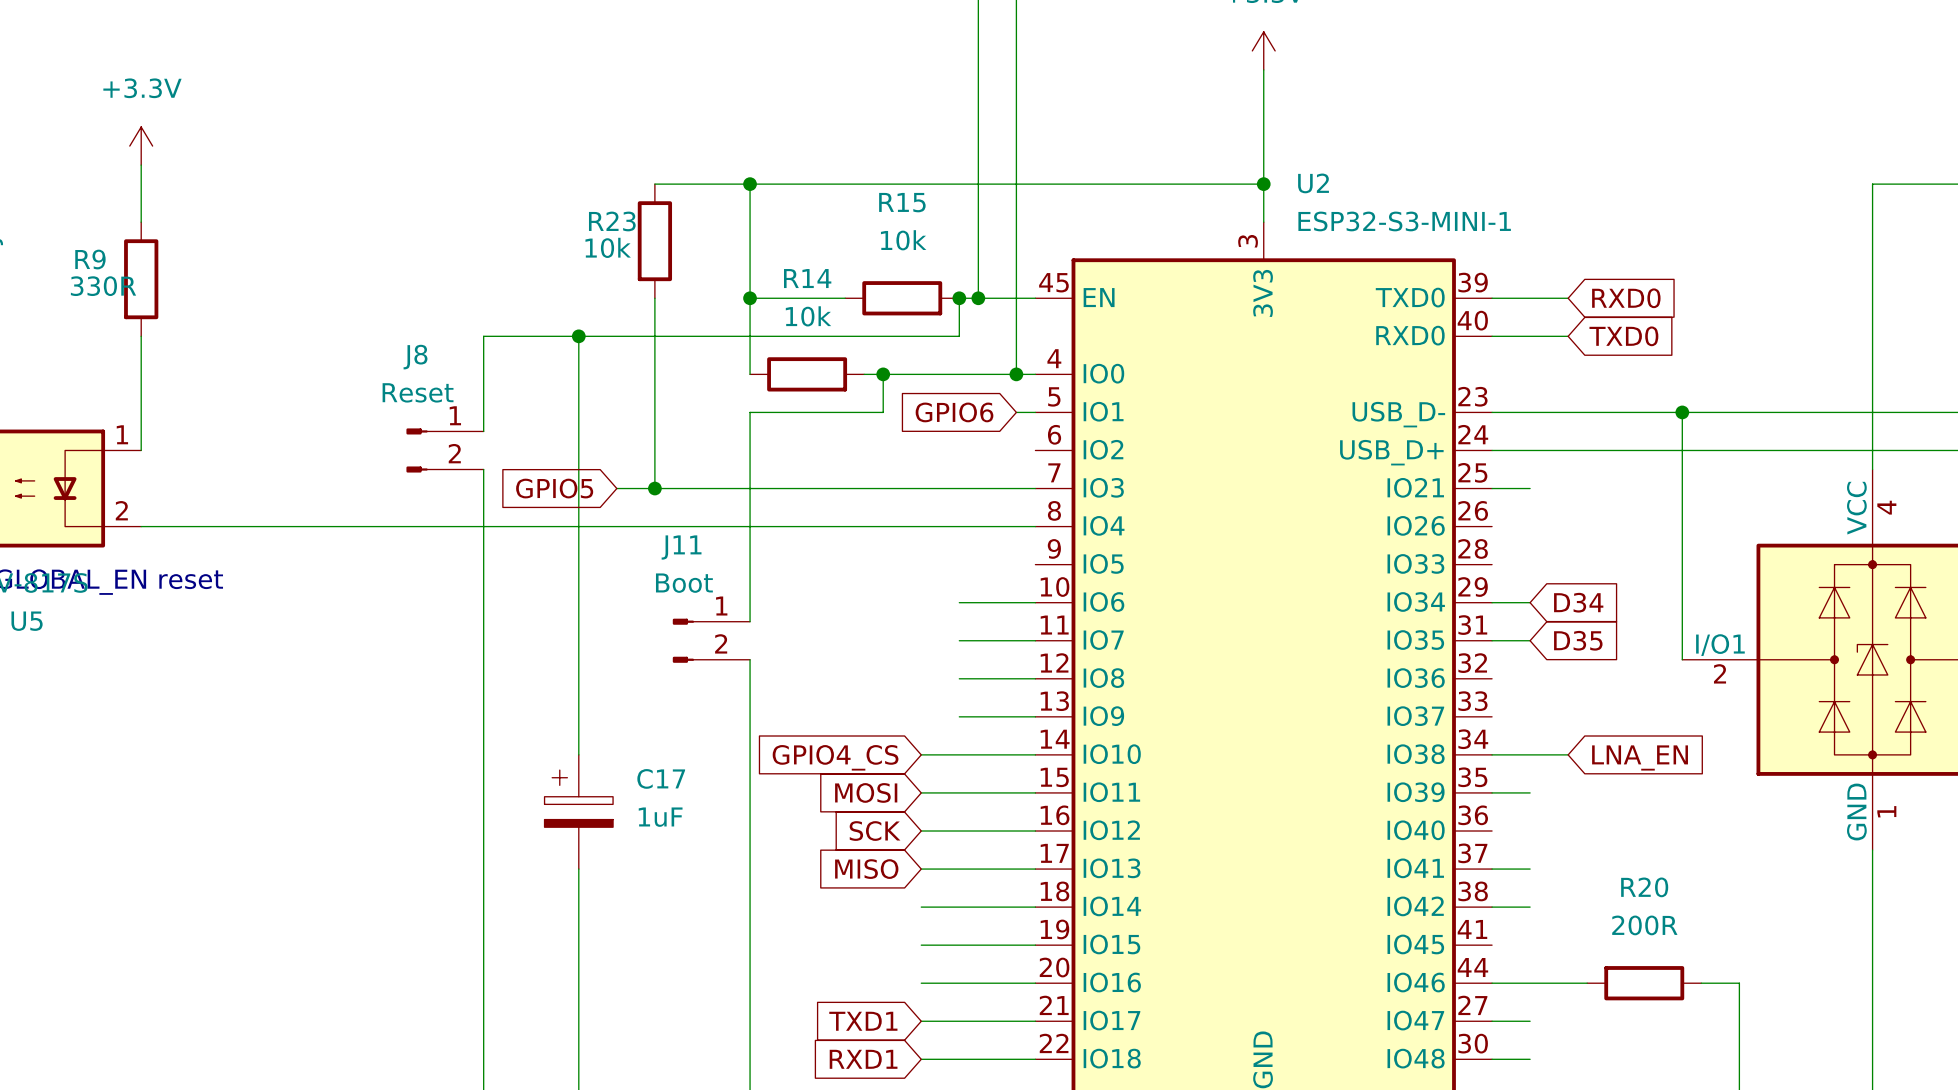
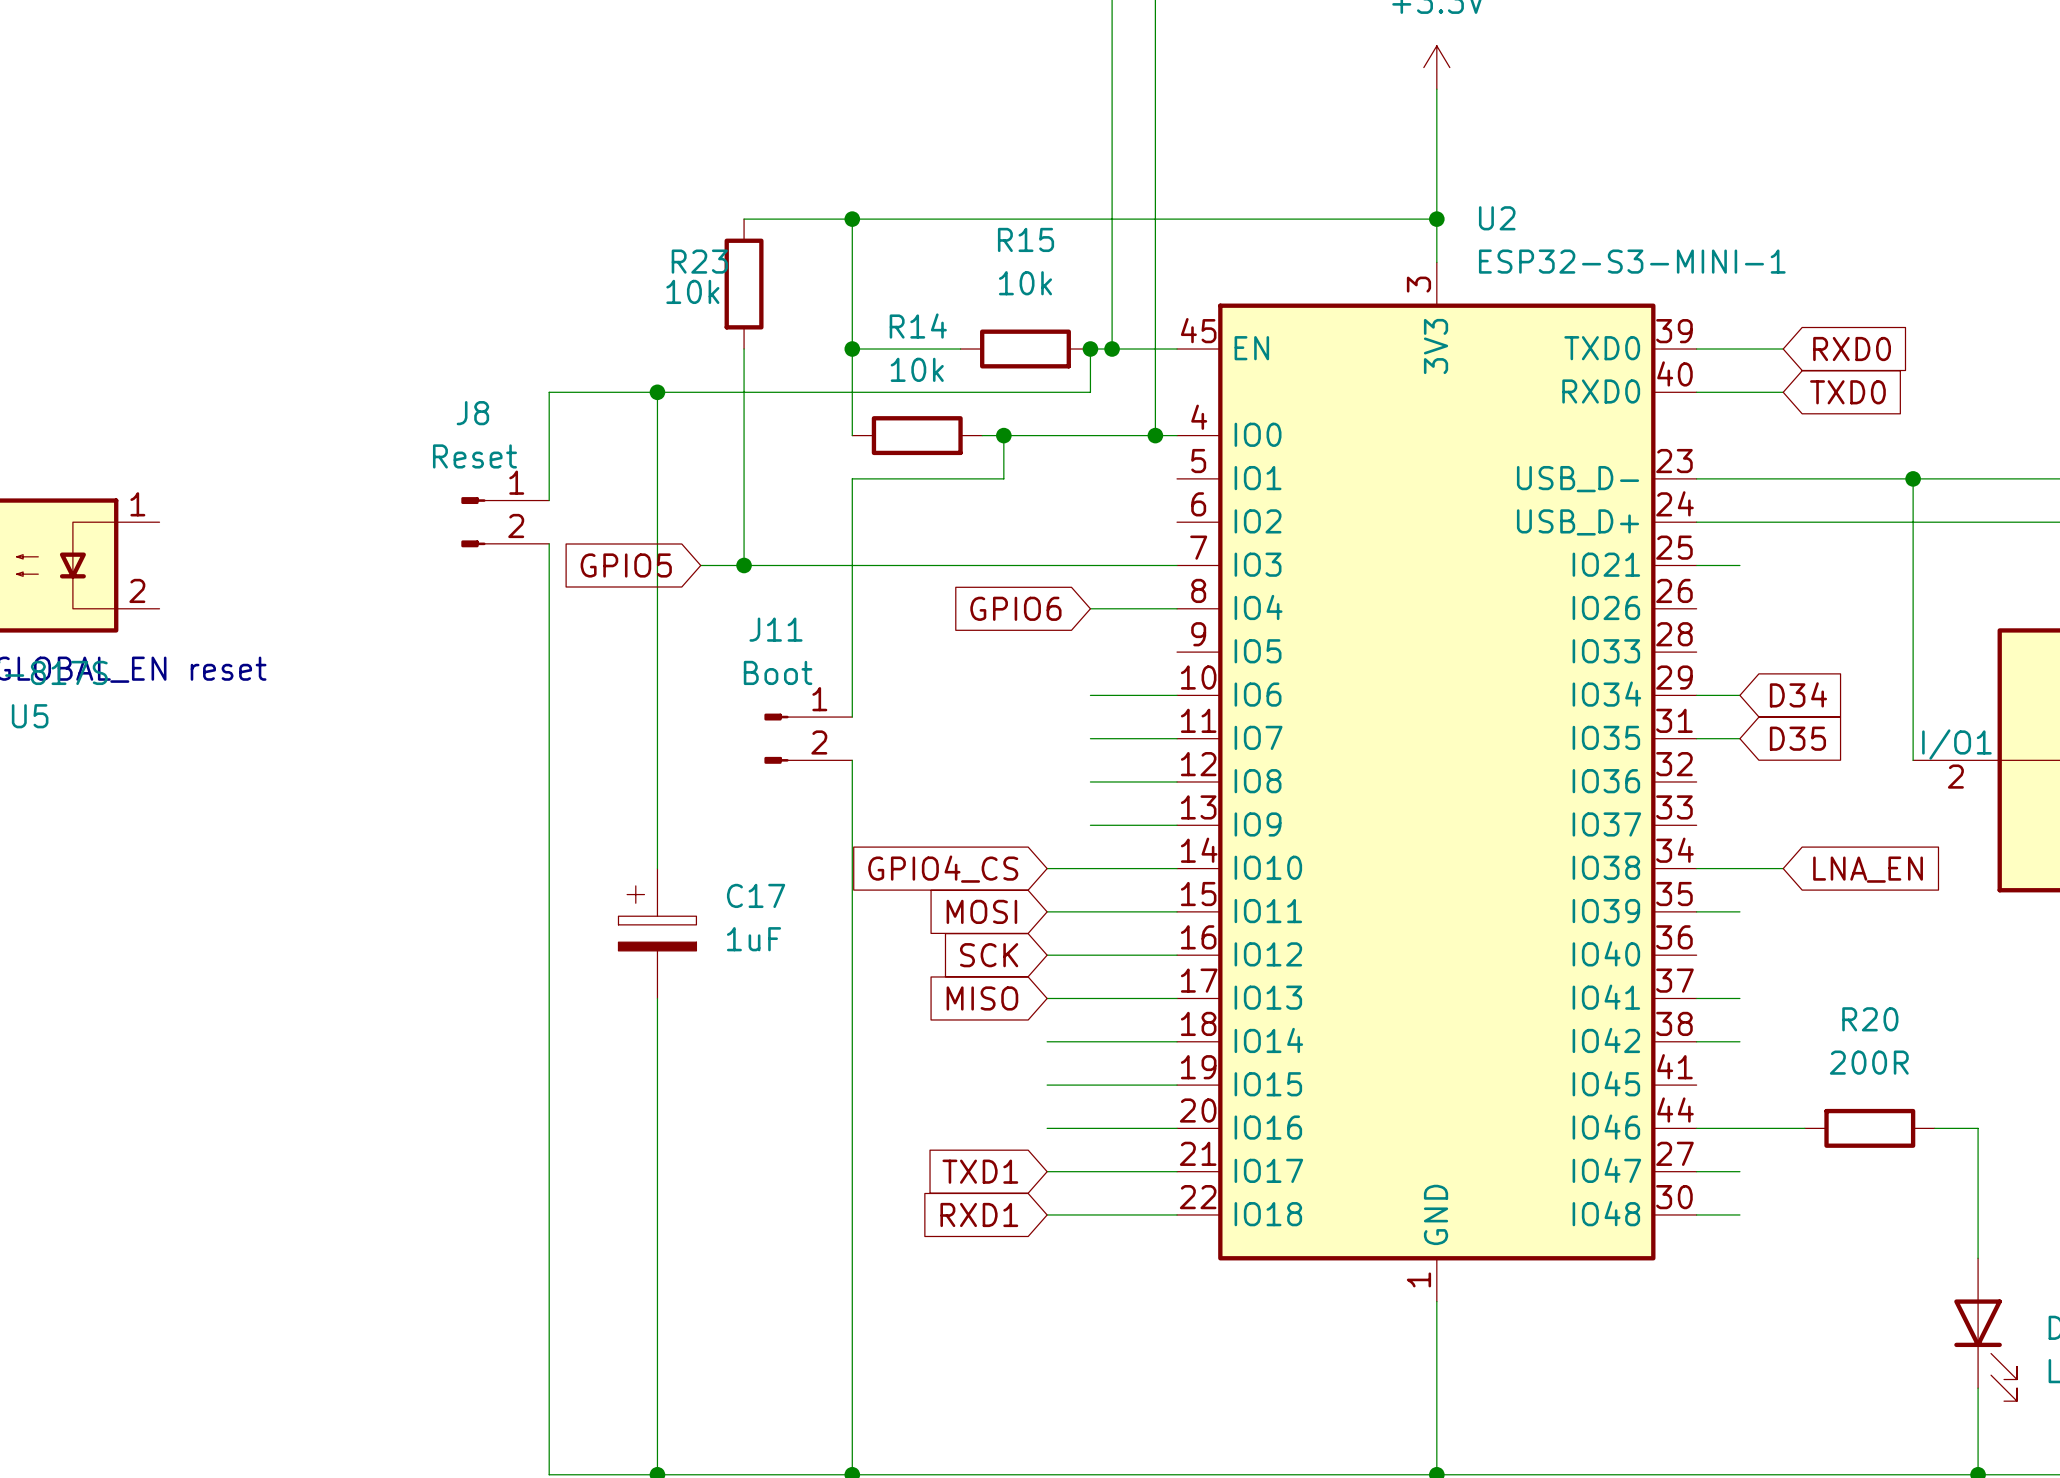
power symbol: +3.3V (141, 146) -> none
wire: (141, 165) (141, 222) -> none
R9: 330R (141, 279) -> none
wire: (141, 336) (141, 450) -> none
global label position: GPIO6 (954, 412) -> GPIO6 (1015, 608)
wire: (1016, 412) (1035, 412) -> none
wire: (141, 526) (959, 526) -> none

